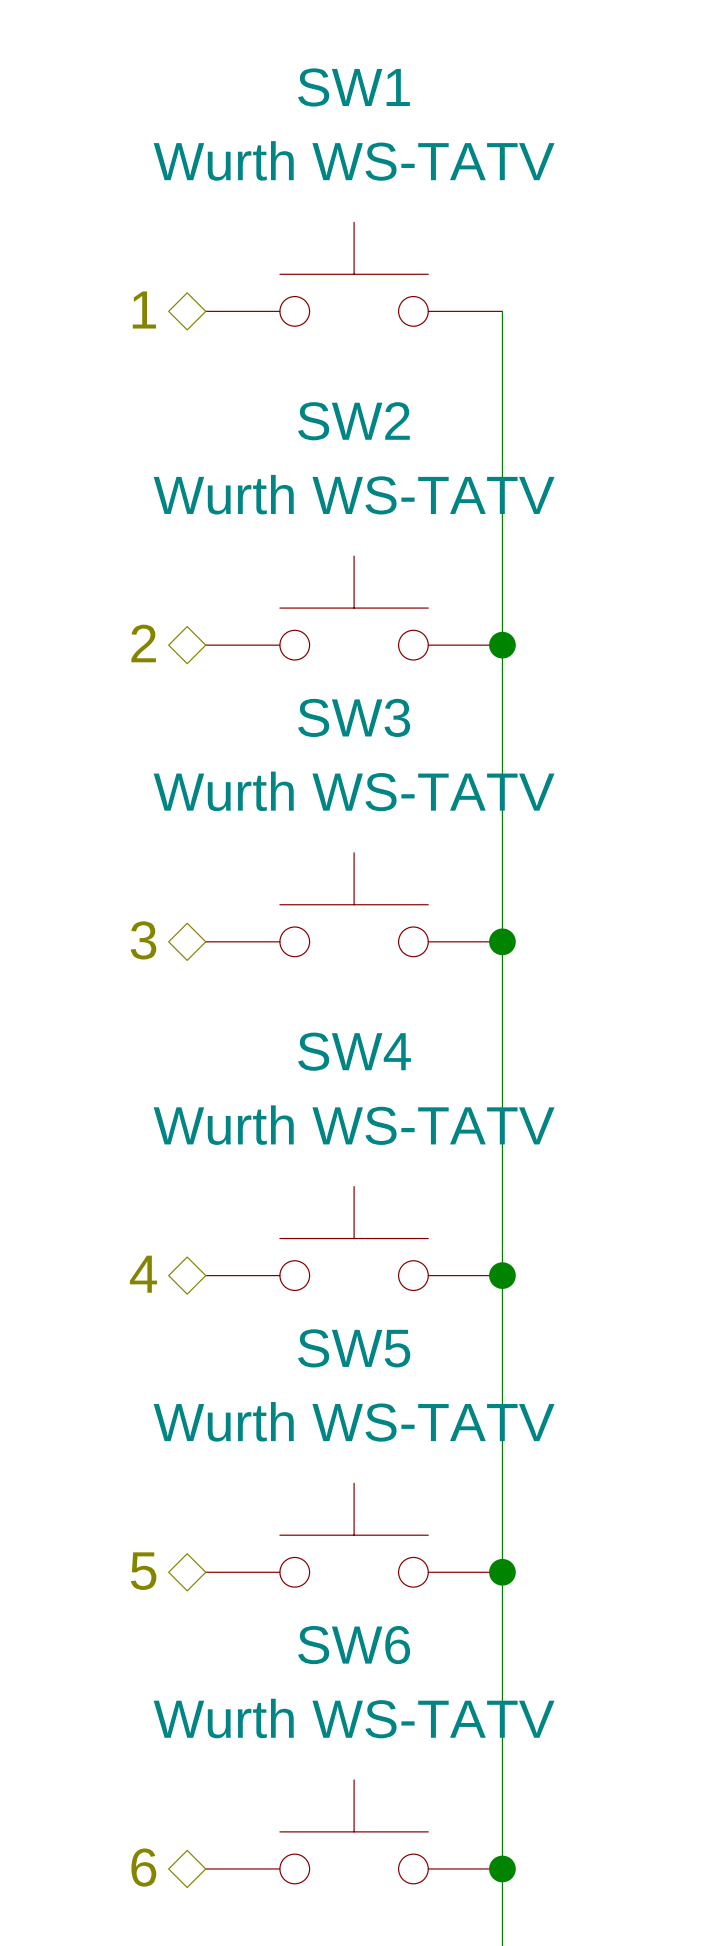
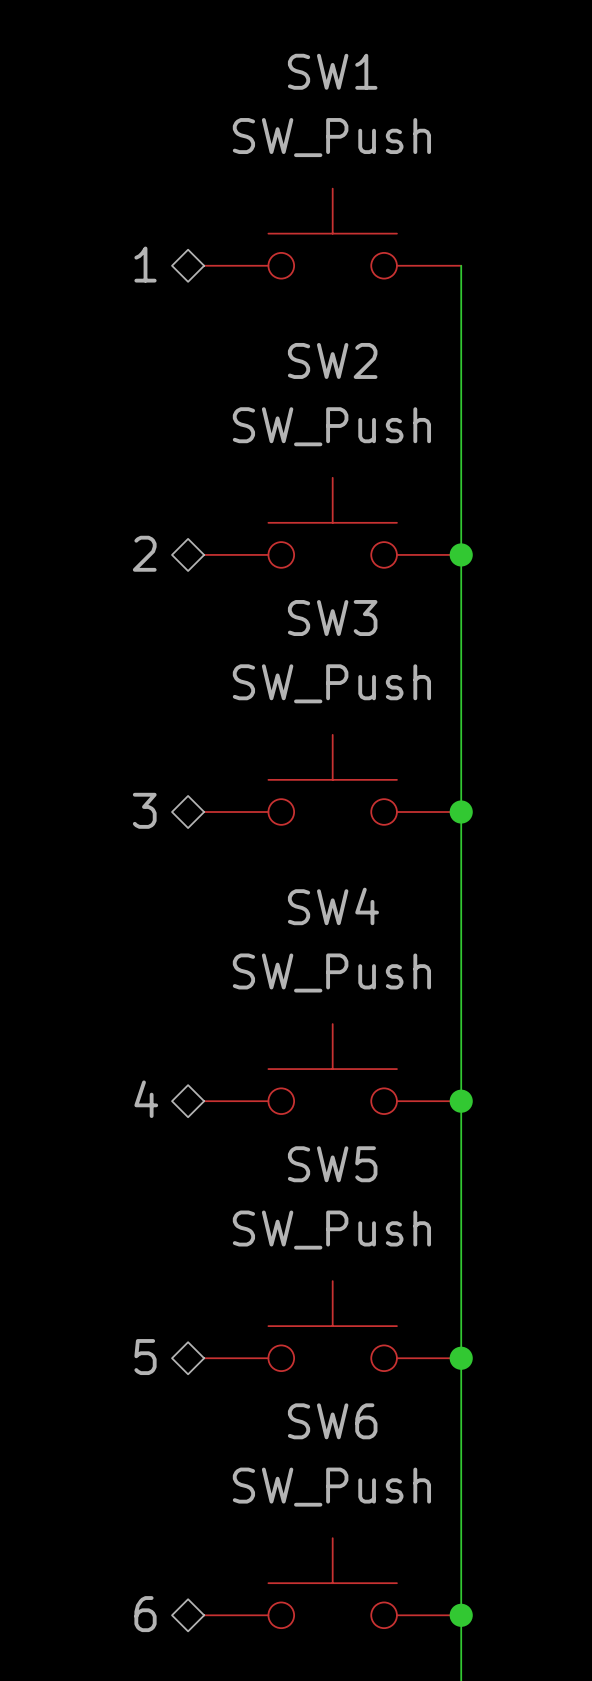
SW1 value: Wurth WS-TATV (354, 160) -> SW_Push (331, 137)
SW2 value: Wurth WS-TATV (354, 494) -> SW_Push (331, 426)
SW3 value: Wurth WS-TATV (354, 791) -> SW_Push (331, 683)
SW4 value: Wurth WS-TATV (354, 1125) -> SW_Push (331, 972)
SW5 value: Wurth WS-TATV (354, 1421) -> SW_Push (331, 1230)
SW6 value: Wurth WS-TATV (354, 1718) -> SW_Push (331, 1487)

